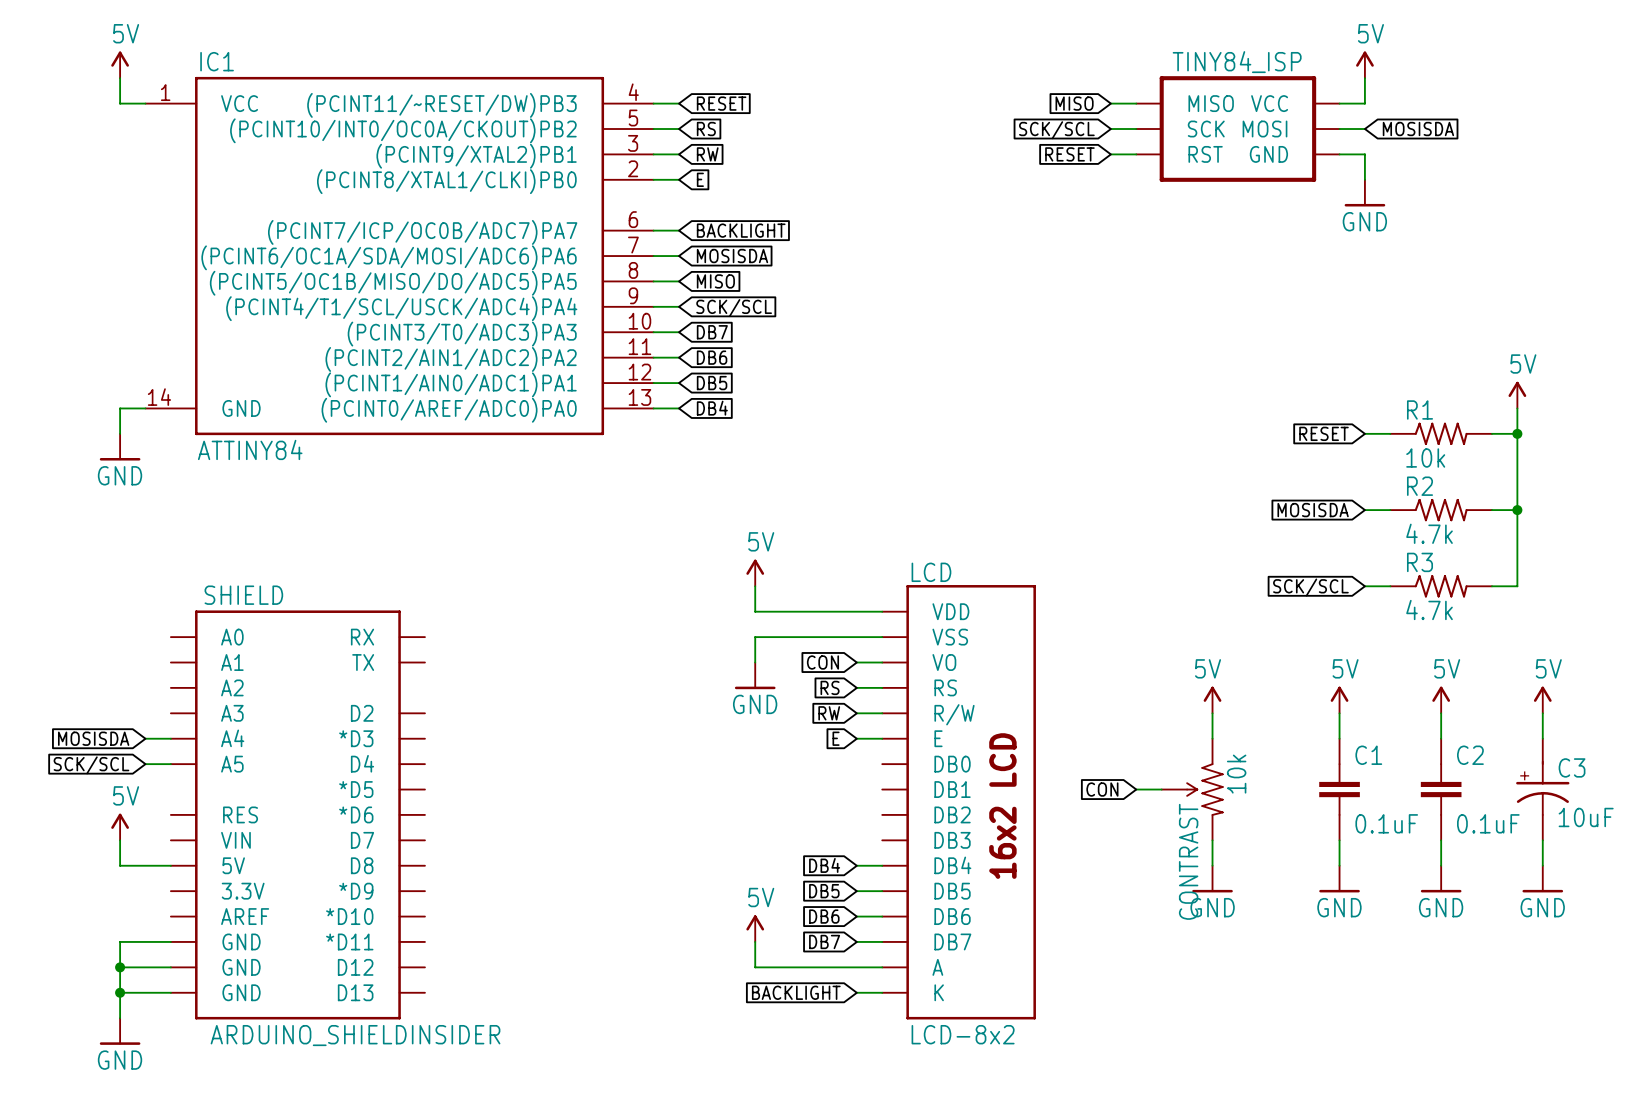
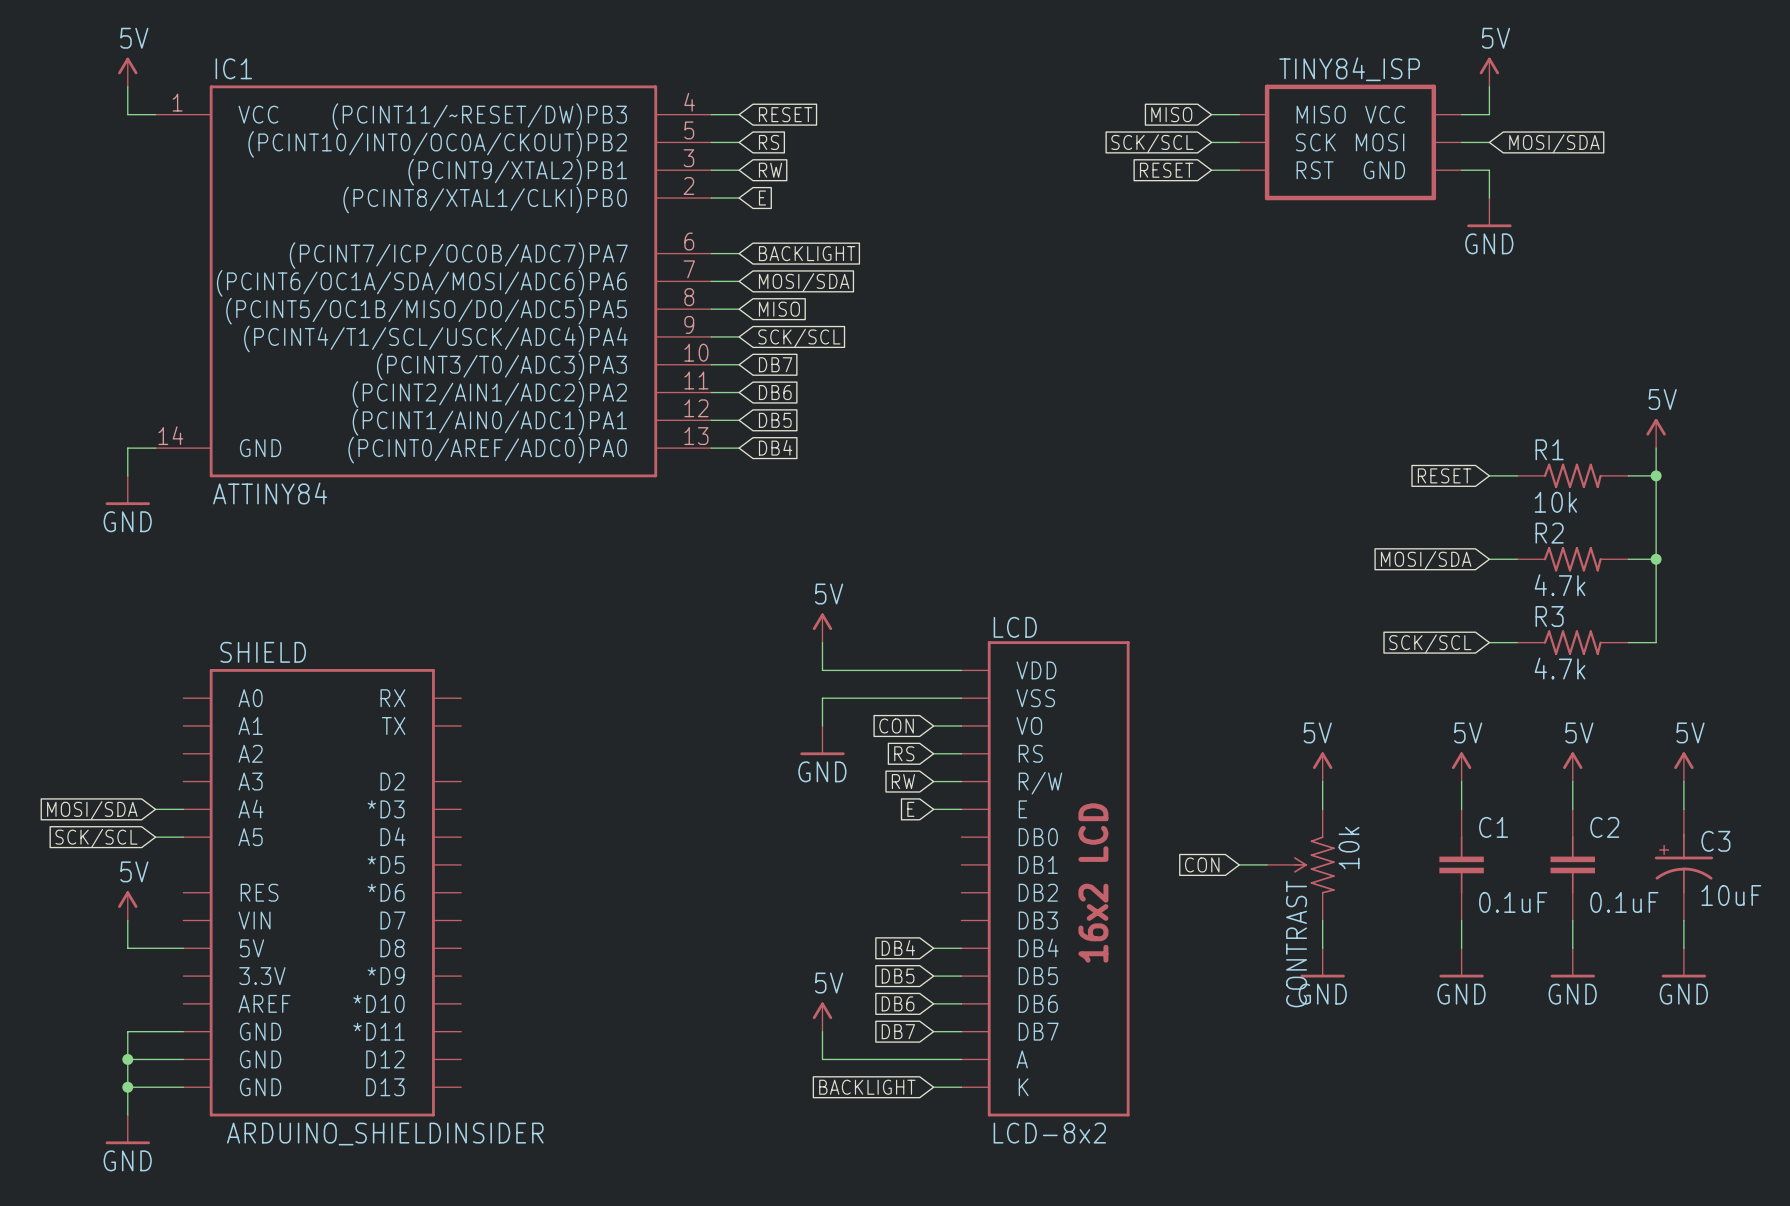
global label: MOSISDA (1418, 129) -> MOSI/SDA (1554, 143)
global label: MOSISDA (732, 256) -> MOSI/SDA (804, 282)
global label: MOSISDA (1313, 510) -> MOSI/SDA (1426, 560)
global label: MOSISDA (93, 738) -> MOSI/SDA (92, 810)

